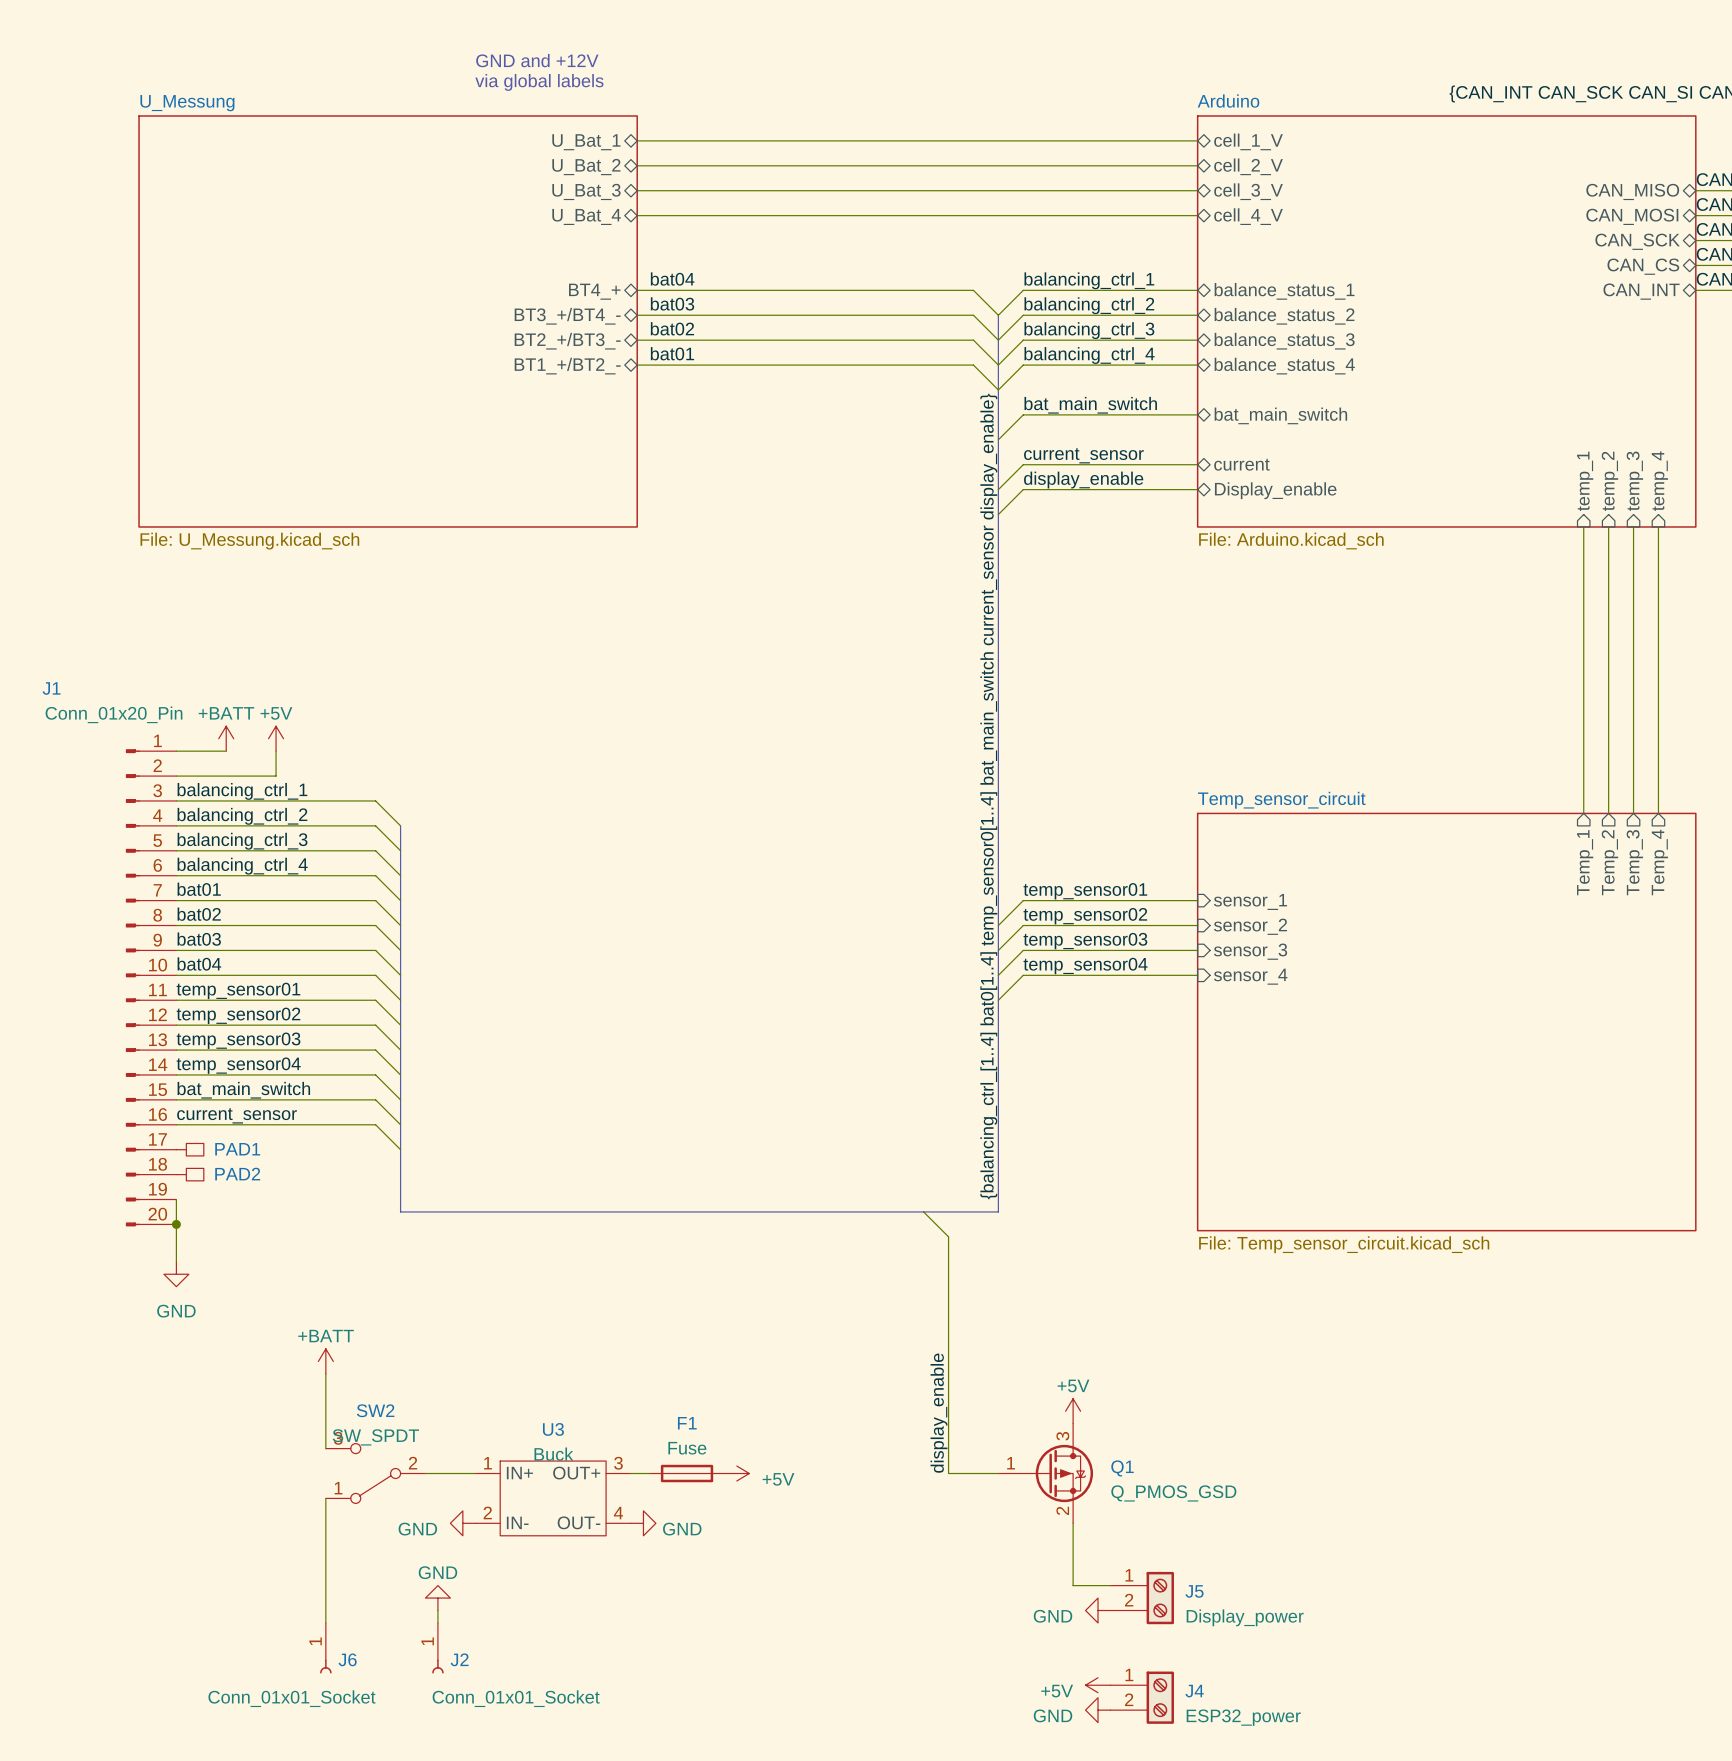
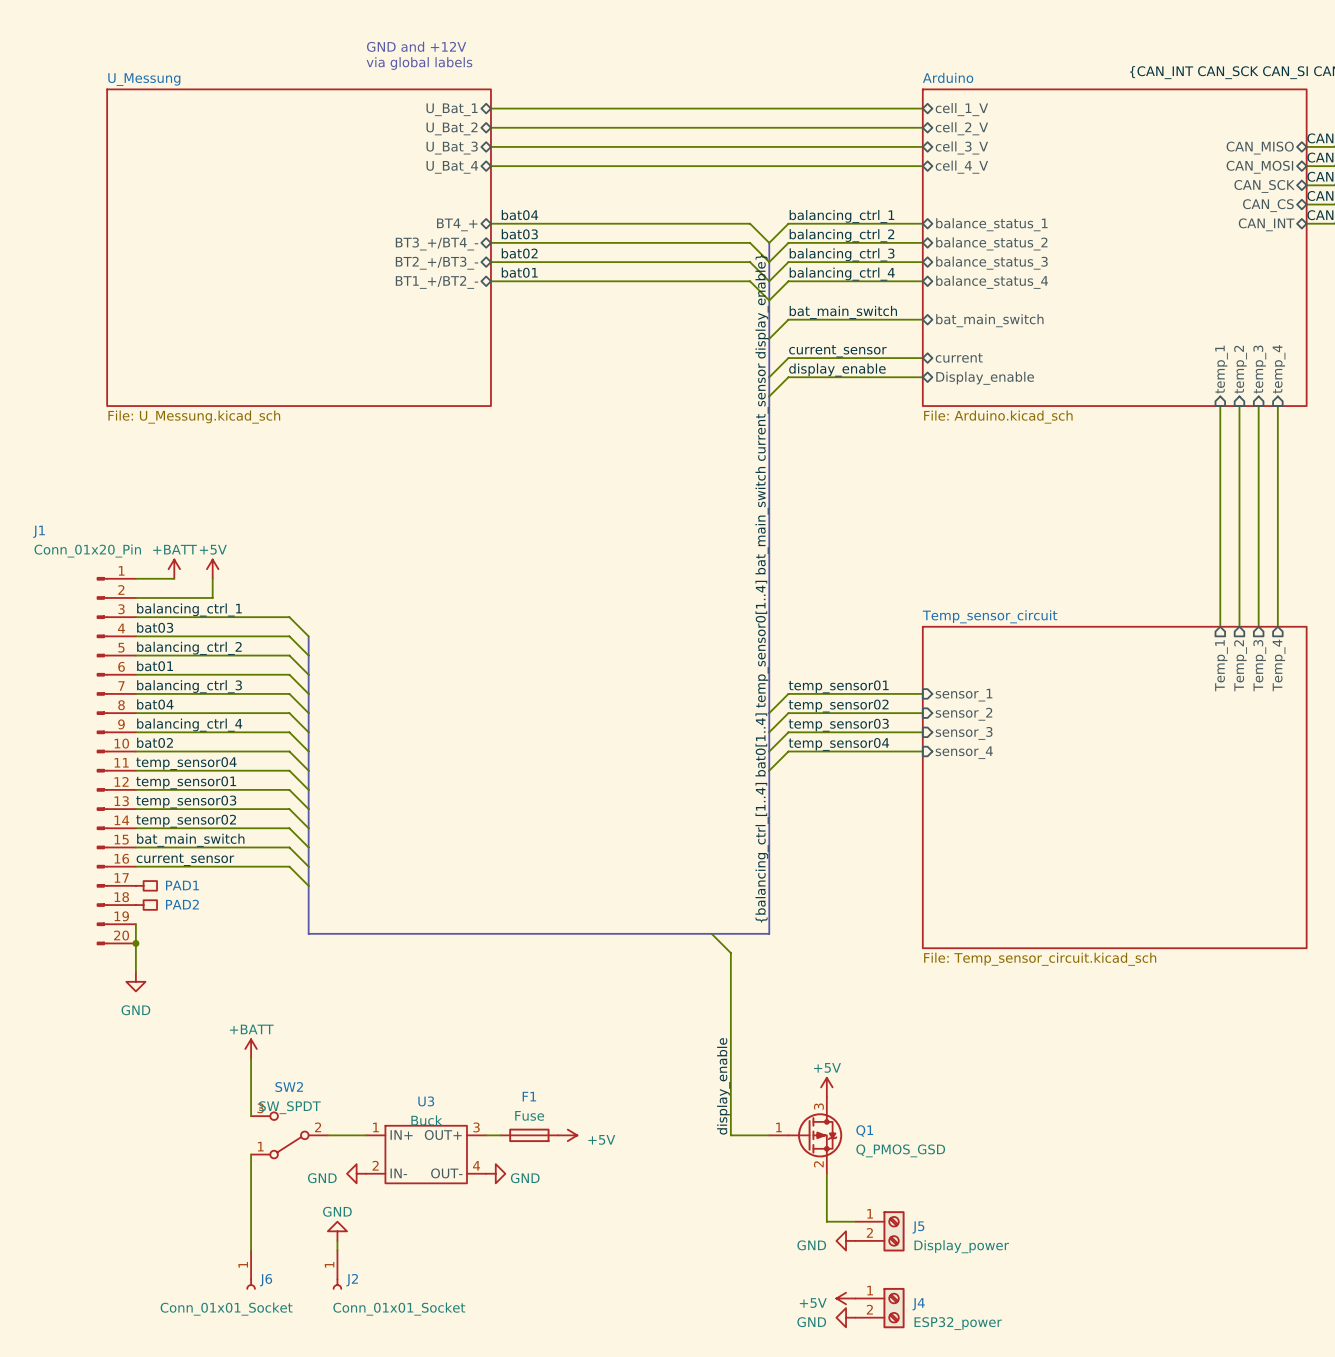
label: balancing_ctrl_2 (242, 816) -> bat03 (155, 627)
label: balancing_ctrl_3 (242, 841) -> balancing_ctrl_2 (189, 648)
label: balancing_ctrl_4 (242, 866) -> bat01 (155, 666)
label: bat01 (199, 889) -> balancing_ctrl_3 (189, 686)
label: bat02 (199, 914) -> bat04 (155, 704)
label: bat03 (199, 939) -> balancing_ctrl_4 (189, 725)
label: bat04 (199, 963) -> bat02 (155, 742)
label: temp_sensor01 (238, 990) -> temp_sensor04 (186, 763)
label: temp_sensor02 (238, 1015) -> temp_sensor01 (186, 782)
label: temp_sensor04 (238, 1065) -> temp_sensor02 (186, 821)

